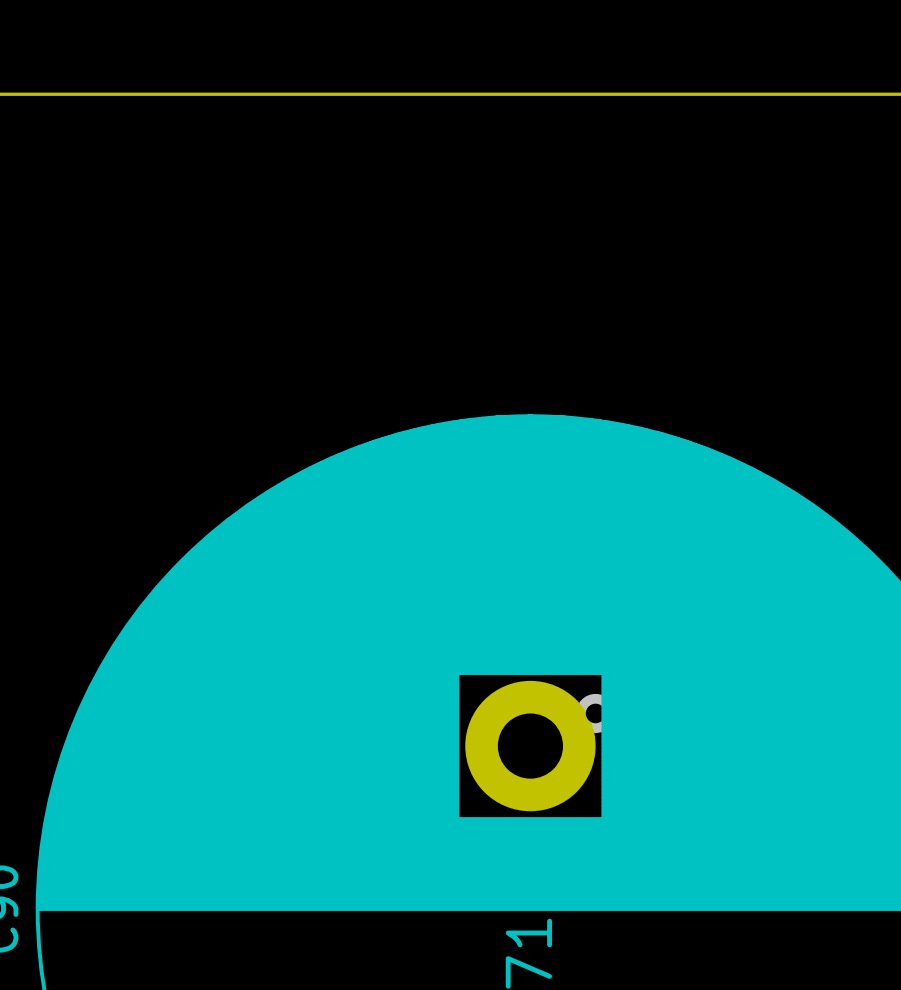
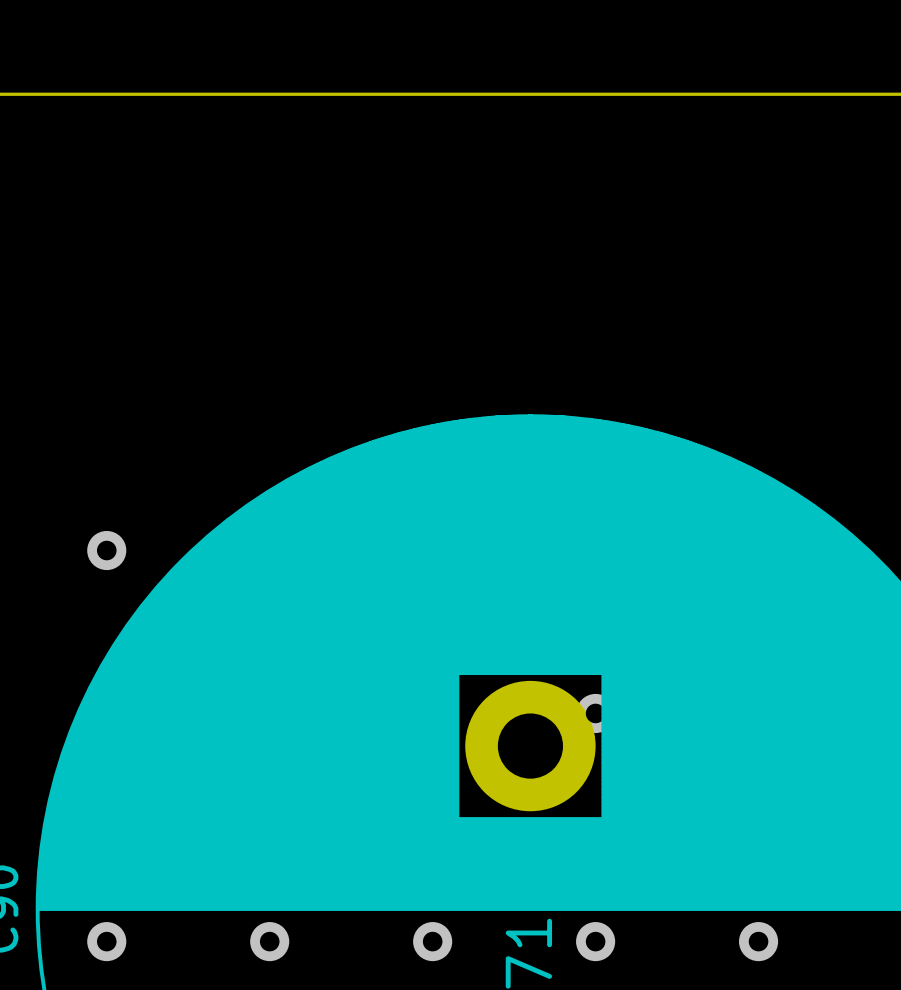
via: none -> (106, 550)
via: none -> (106, 941)
via: none -> (269, 941)
via: none -> (432, 941)
via: none -> (595, 941)
via: none -> (758, 941)

